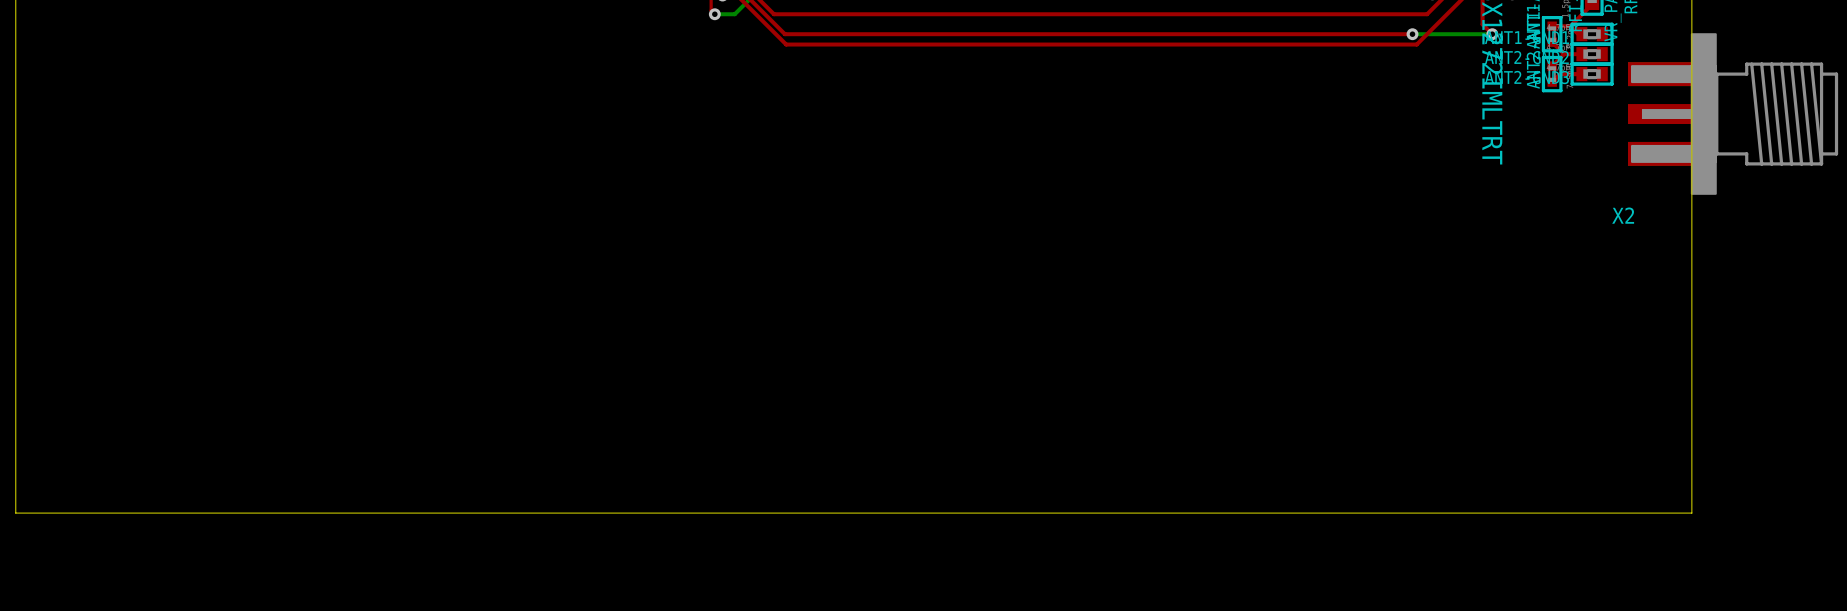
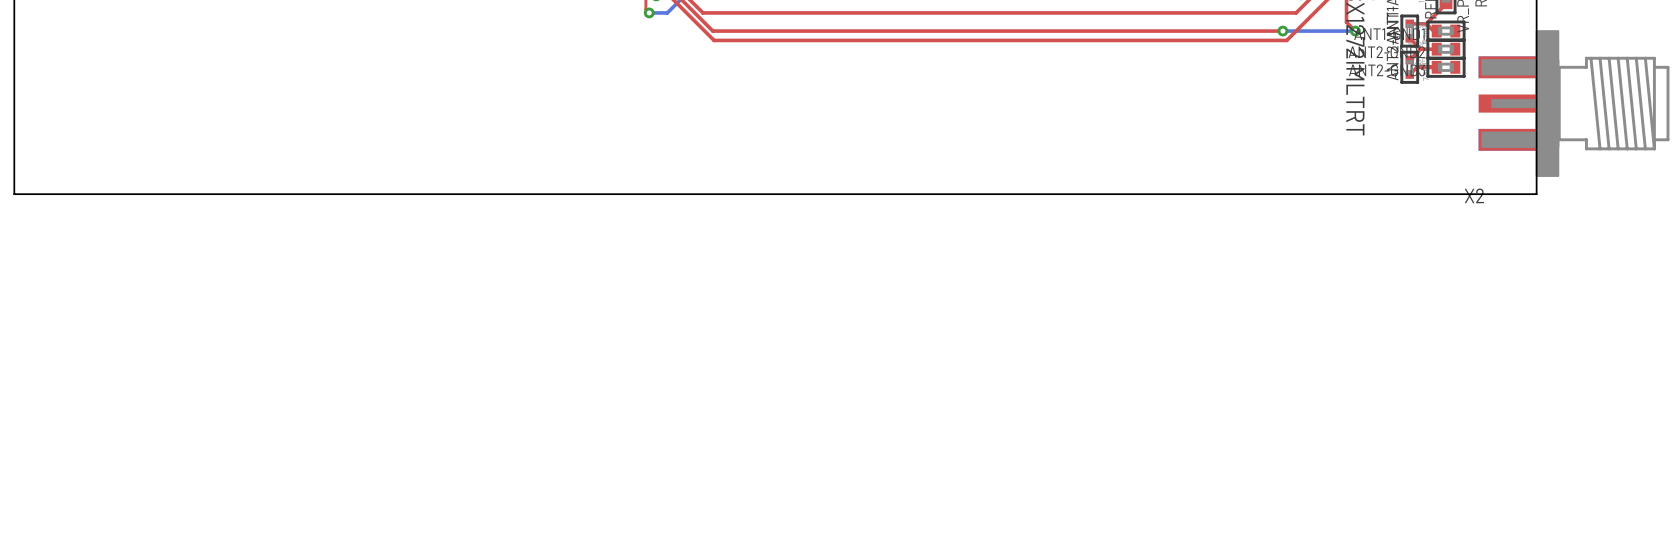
board edge: (15, 213) (15, 513) (1691, 513) (1691, 213) -> (14, 194) (1536, 194)

